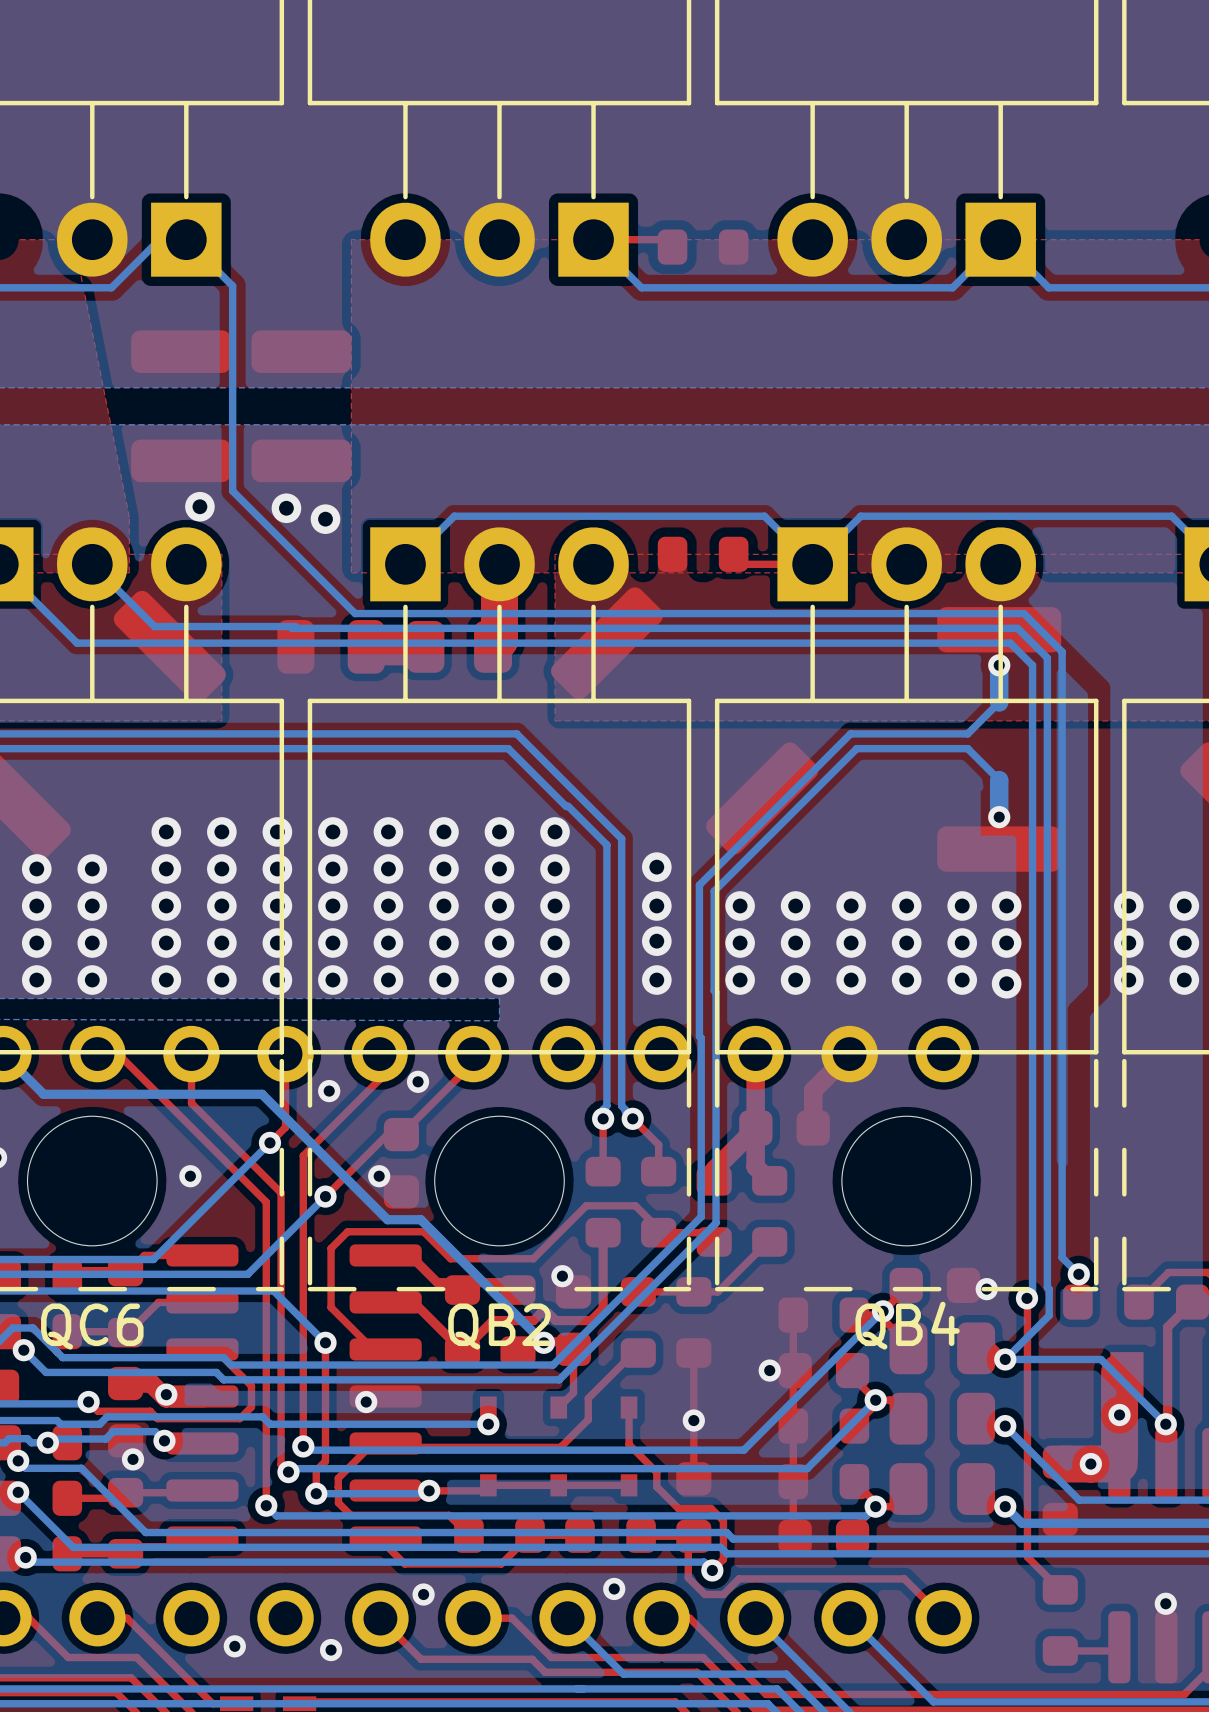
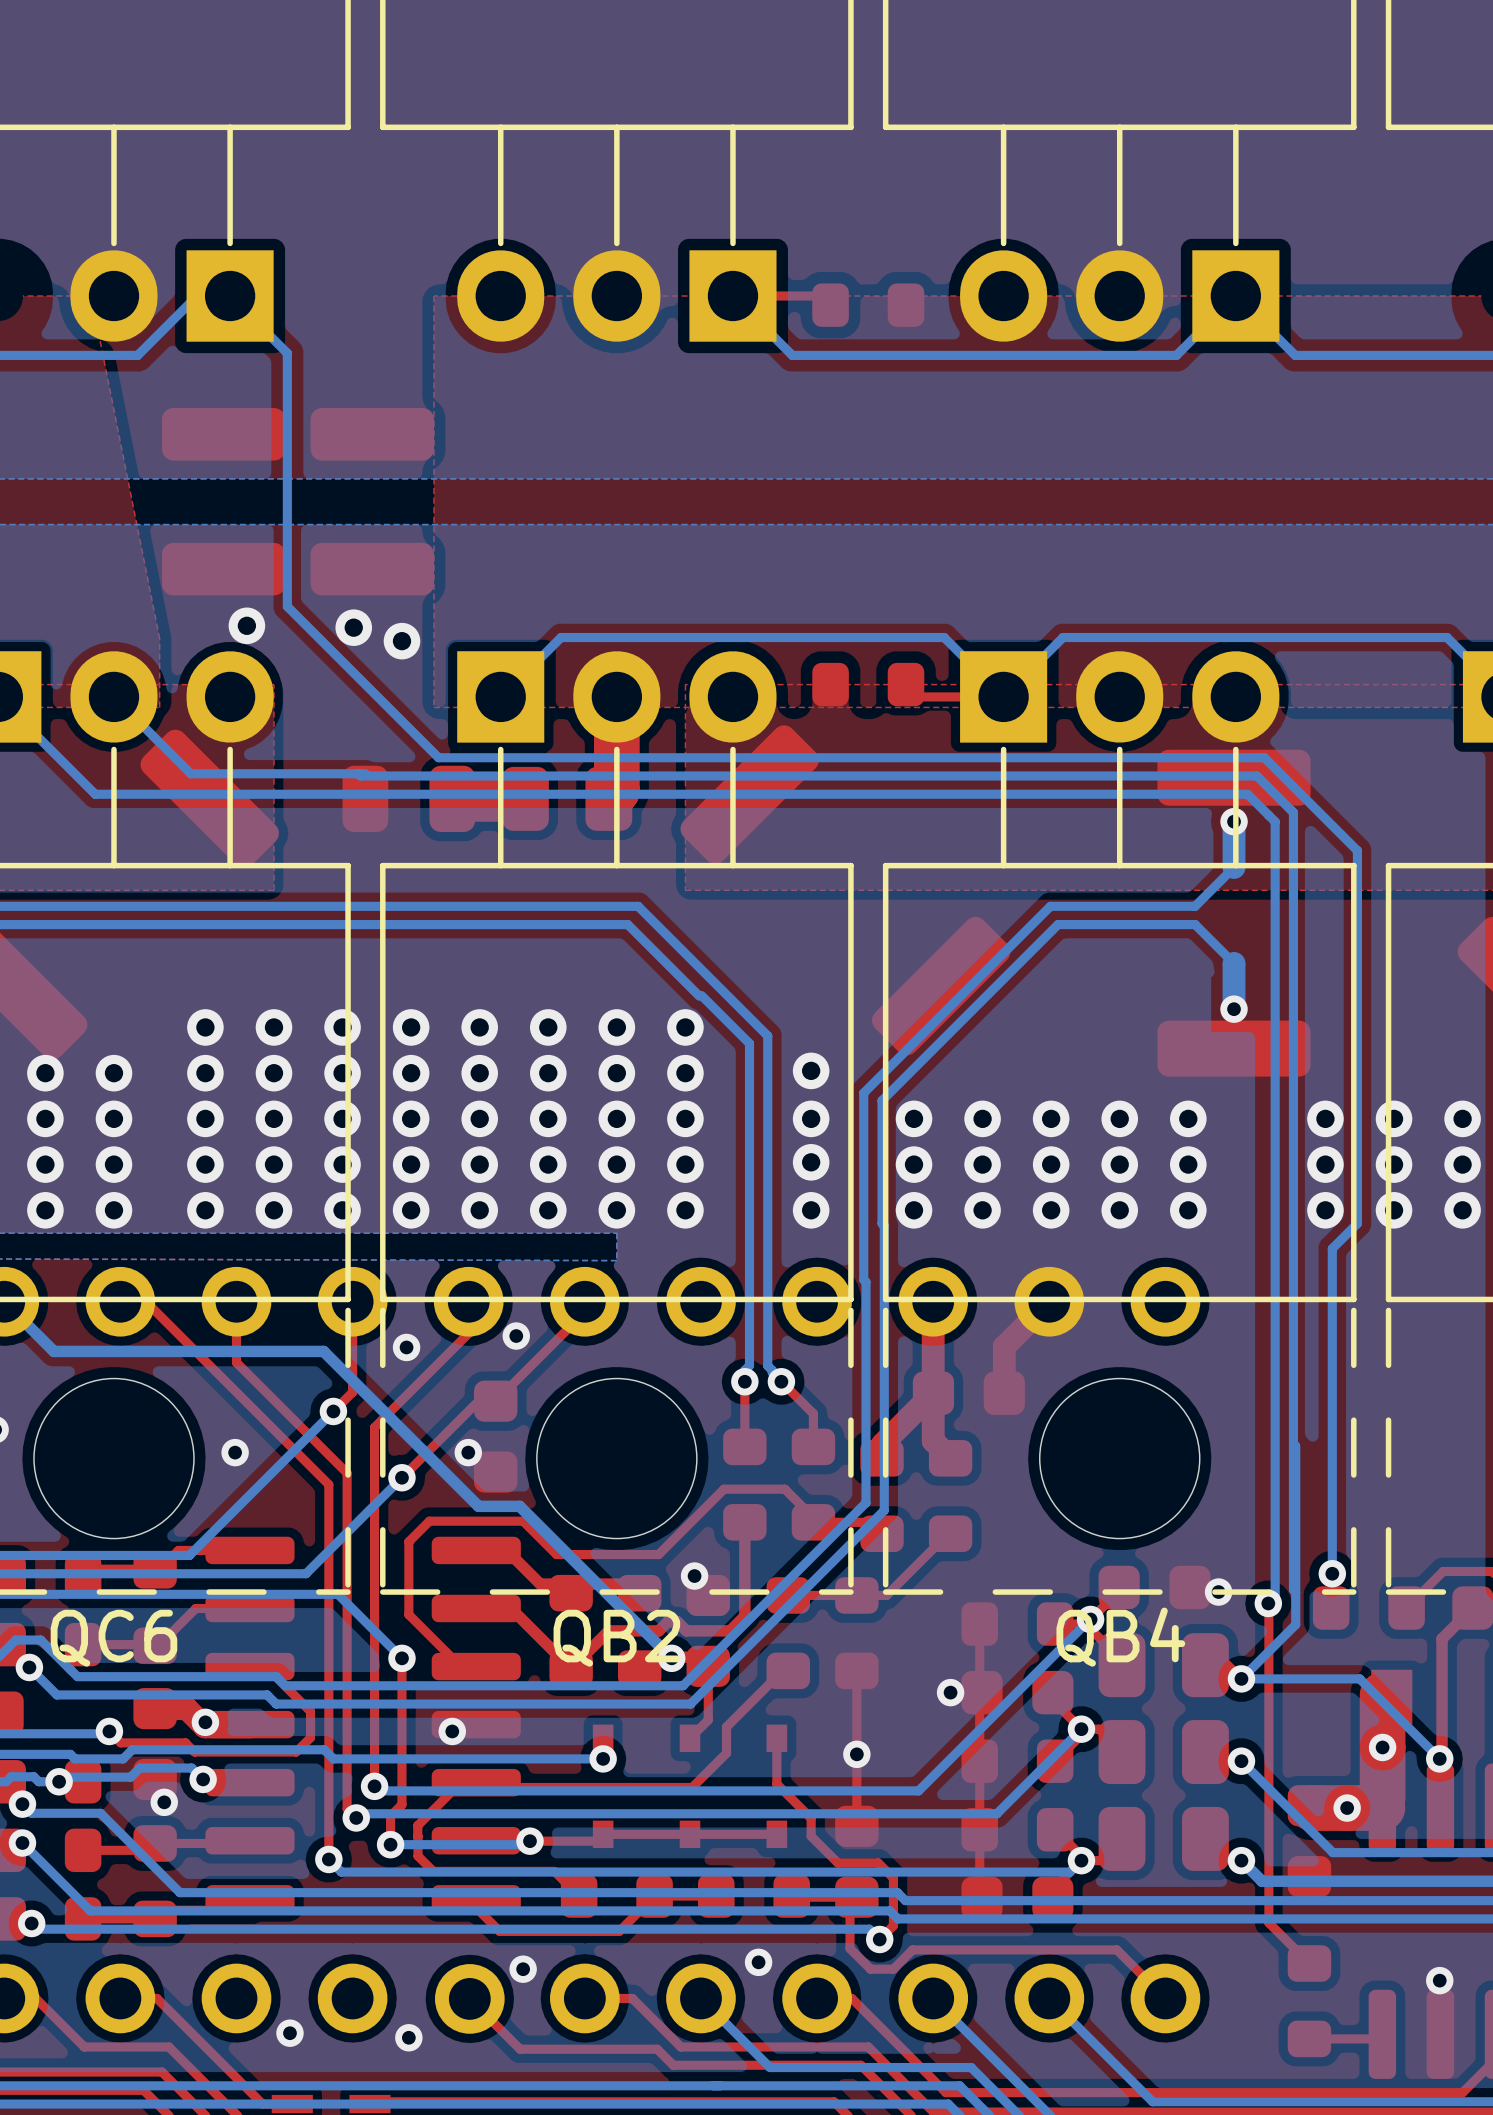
bottom track: (1062, 651) (1062, 1257) (1078, 1274) -> (1311, 805) (1357, 850) (1357, 1223) (1332, 1248) (1332, 1573)
via: (1006, 905) -> none
via: none -> (1325, 1118)
via: (1006, 943) -> none
via: none -> (1325, 1164)
via: none -> (1325, 1210)
via: (1006, 983) -> none

